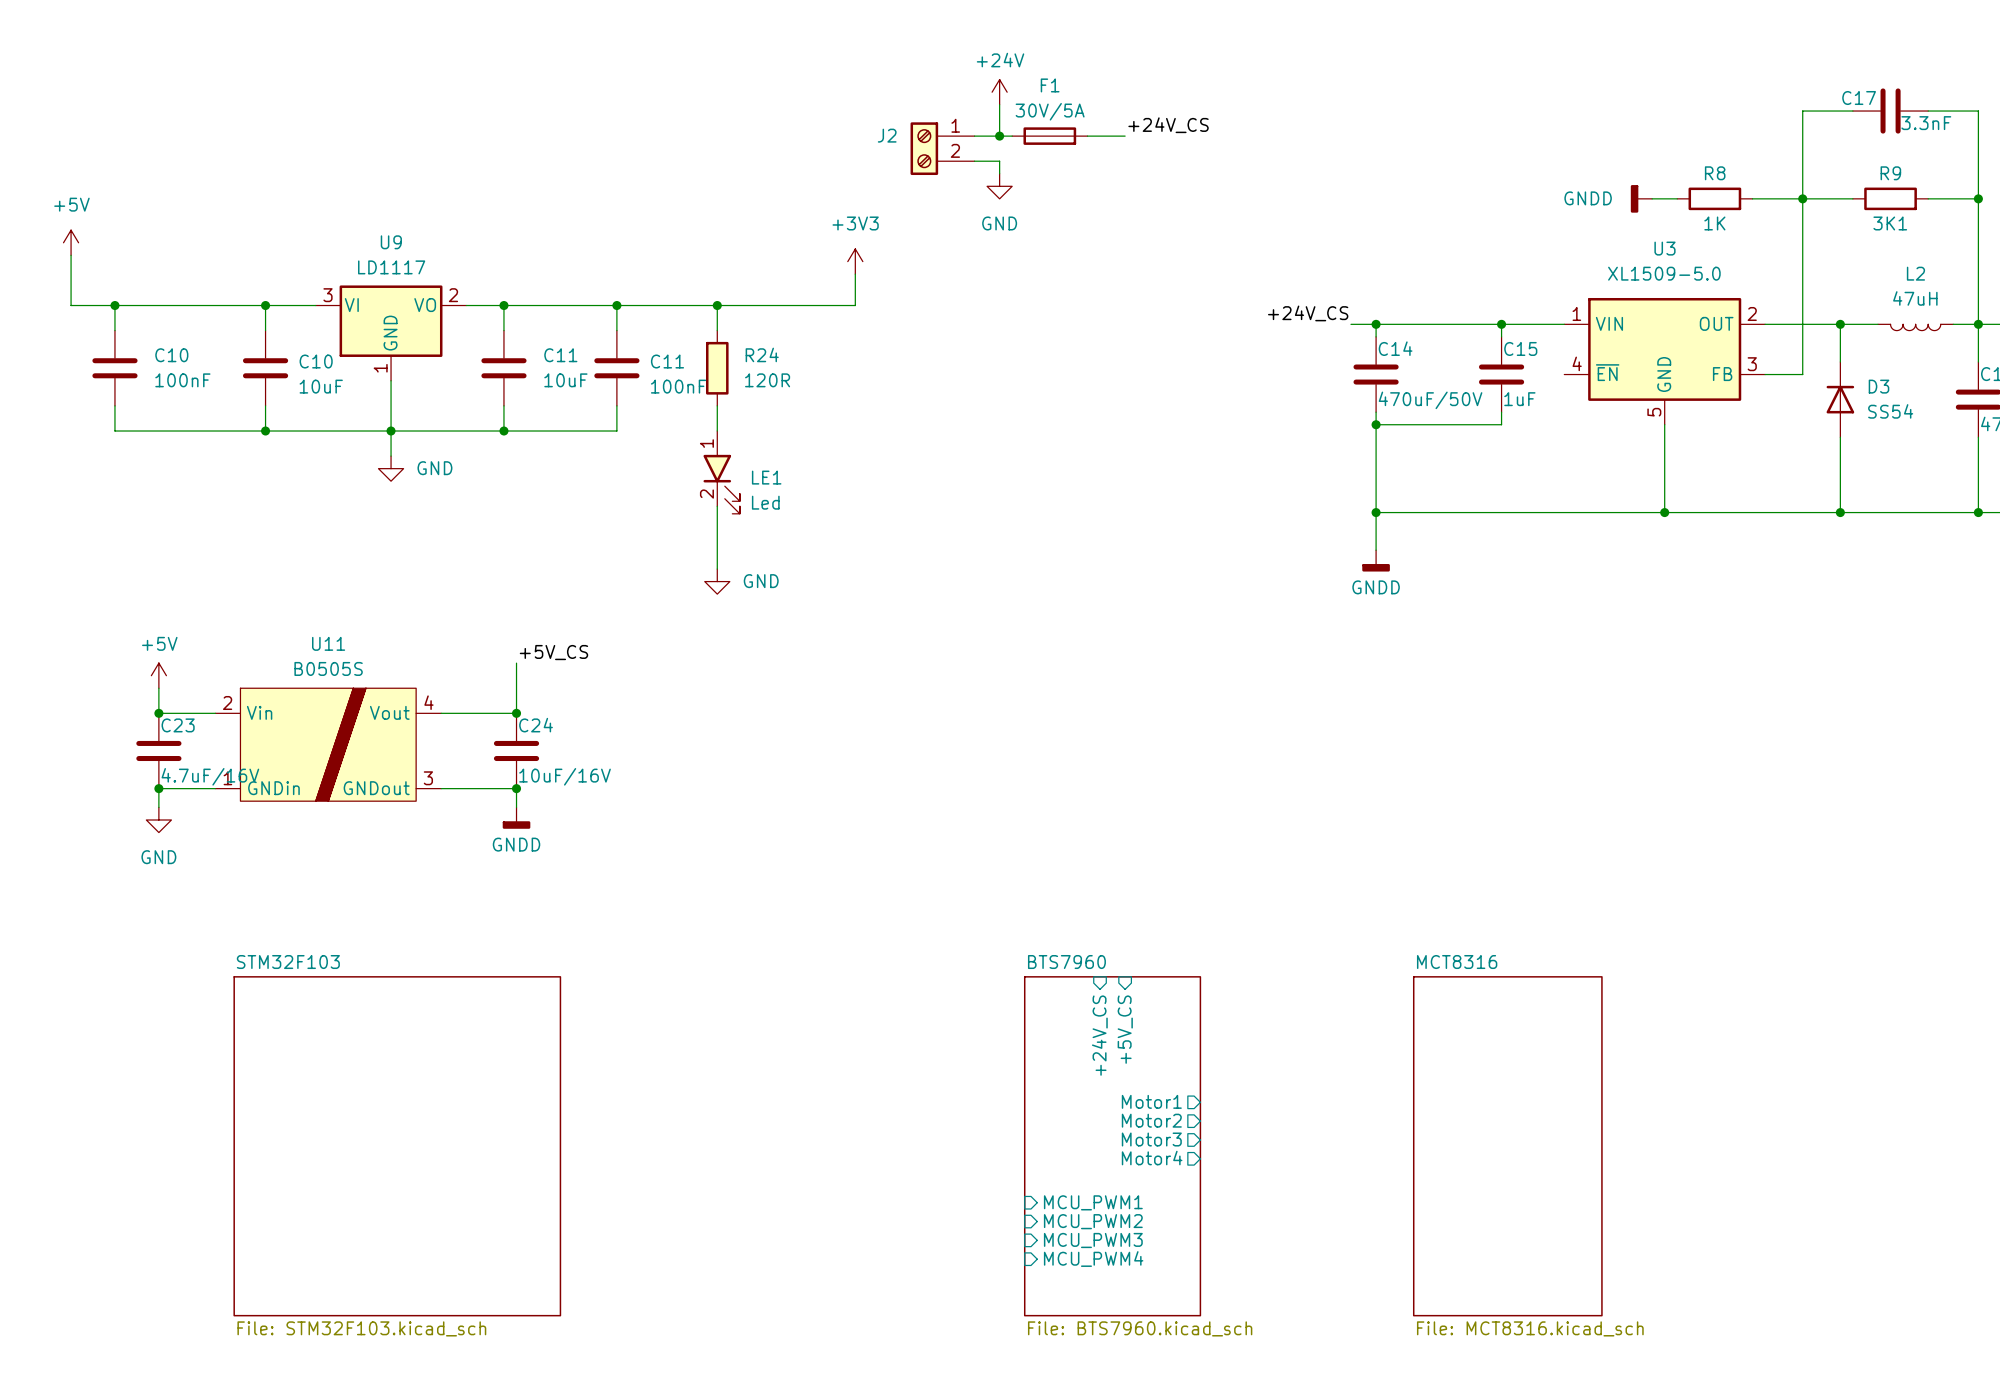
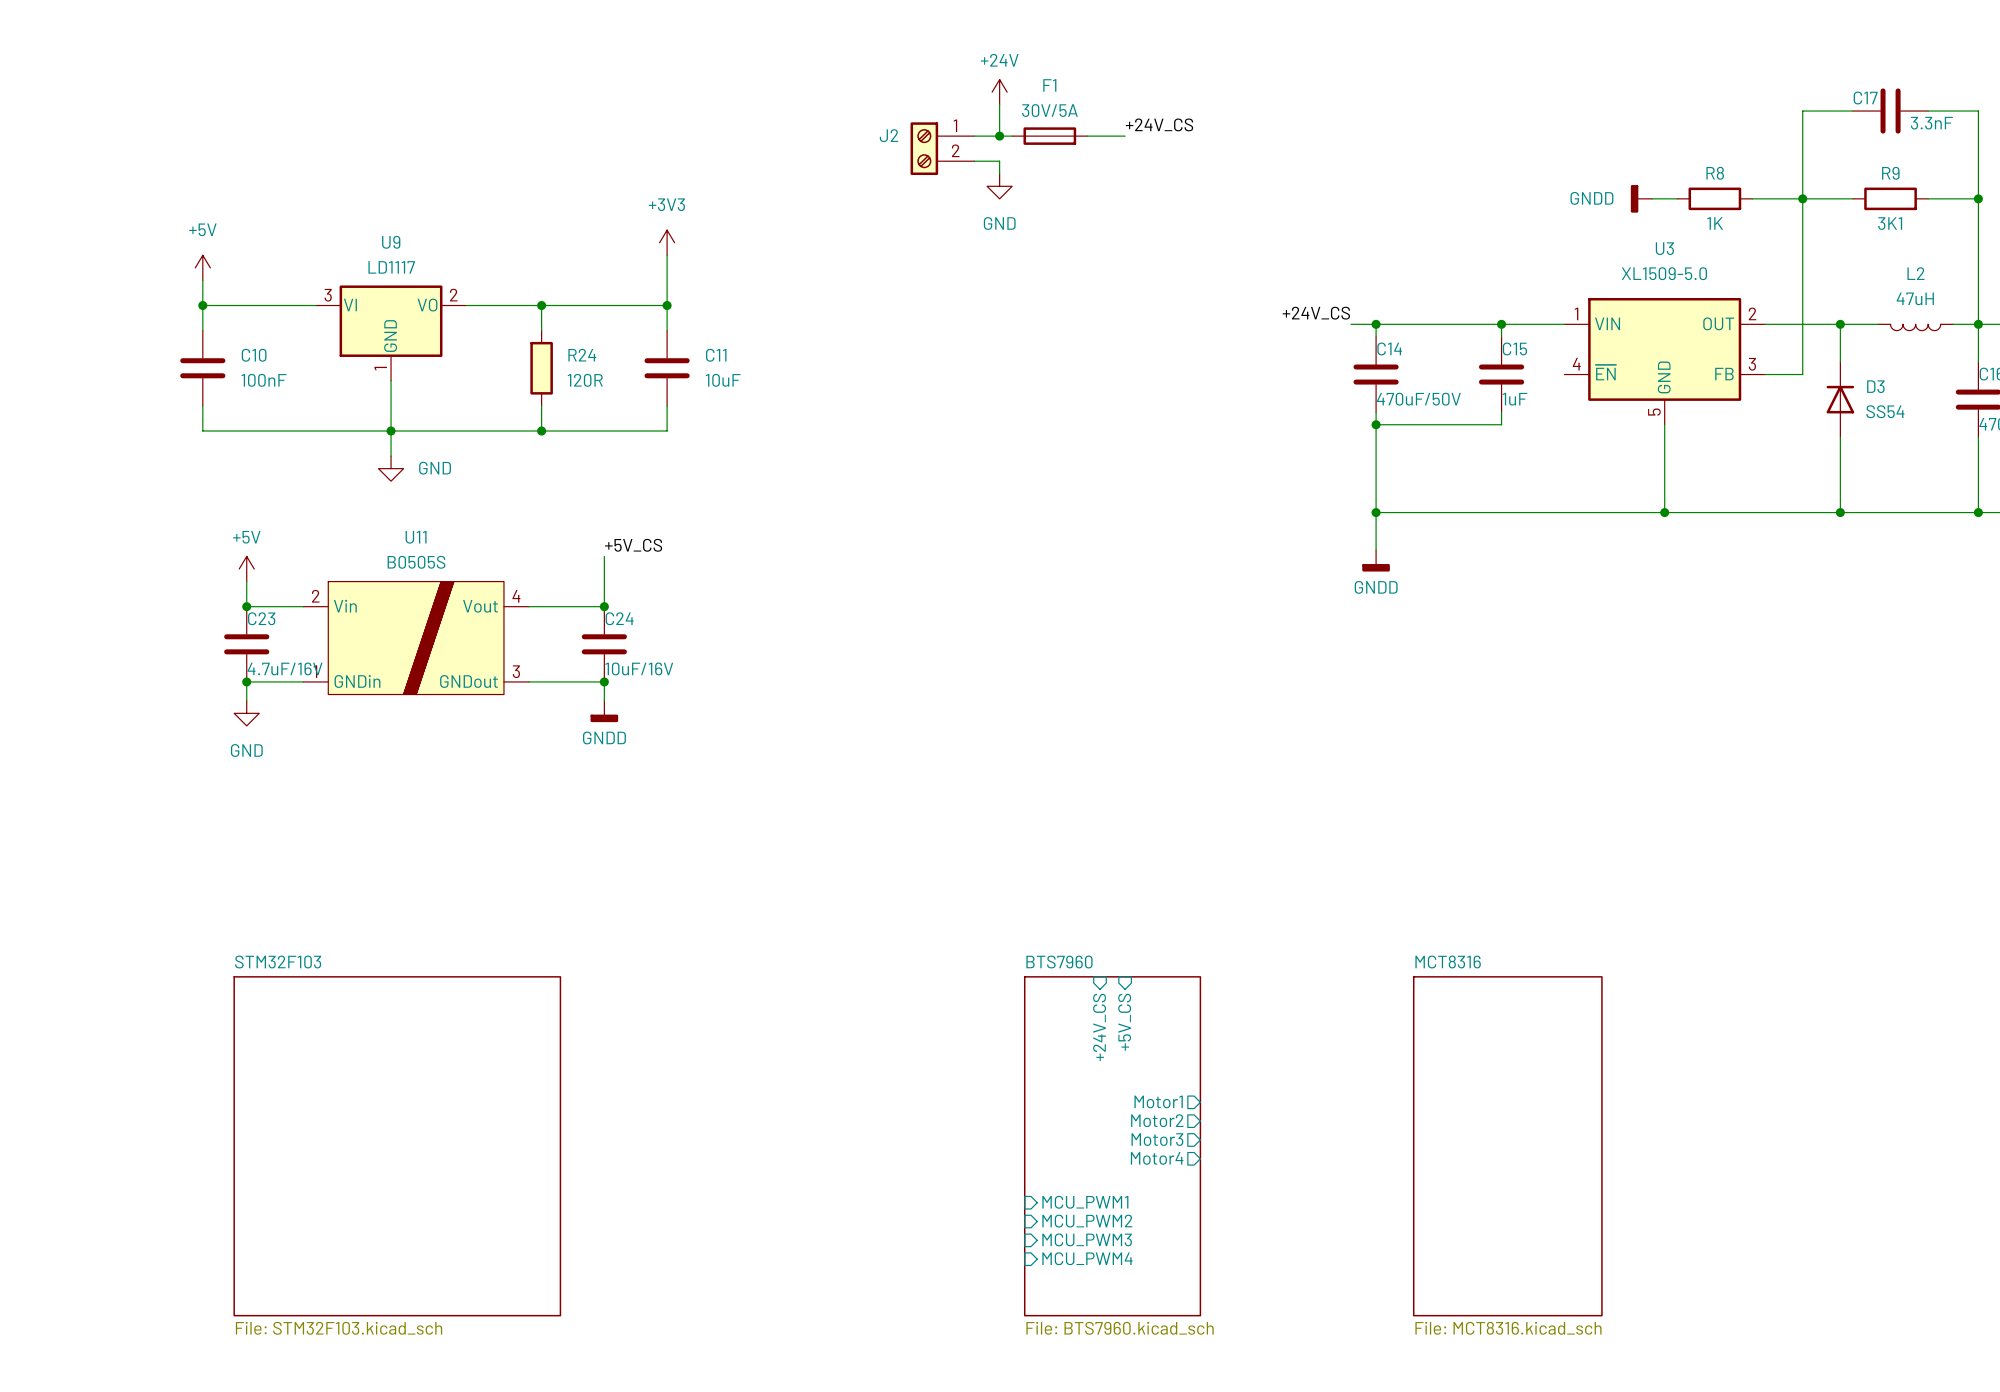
power symbol position: +5V (71, 242) -> +5V (202, 267)
wire: (71, 255) (71, 305) (202, 305) -> none
wire: none -> (667, 255) (667, 330)
power symbol position: +3V3 (855, 261) -> +3V3 (667, 242)
wire: (855, 274) (855, 305) (667, 305) -> none
wire: none -> (202, 280) (202, 330)
wire: (114, 305) (114, 330) -> none
junction: (114, 305) -> none
junction: none -> (202, 305)
wire: (265, 305) (265, 330) -> none
junction: (265, 305) -> none
wire: (503, 305) (503, 330) -> (541, 305) (541, 330)
junction: (503, 305) -> none
junction: none -> (541, 305)
wire: (616, 305) (616, 330) -> none
junction: (616, 305) -> none
junction: none -> (667, 305)
wire: (717, 305) (717, 330) -> none
junction: (717, 305) -> none
C10 position: (114, 368) -> (202, 368)
C10: 10uF (265, 368) -> none
C11 position: (503, 368) -> (667, 368)
C11: 100nF (616, 368) -> none
R24 position: (717, 368) -> (541, 368)
wire: (114, 405) (114, 431) (202, 431) -> (202, 405) (202, 431)
wire: (265, 405) (265, 431) -> none
wire: (503, 405) (503, 431) -> (541, 405) (541, 431)
wire: (616, 405) (616, 431) -> (667, 405) (667, 431) (616, 431)
wire: (717, 405) (717, 431) -> none
junction: (265, 431) -> none
junction position: (503, 431) -> (541, 431)
LE1: Led (721, 472) -> none
wire: (717, 506) (717, 569) -> none
power symbol: GND (717, 581) -> none
junction: none -> (246, 606)
junction: none -> (604, 606)
label position: +5V_CS (553, 652) -> +5V_CS (633, 545)
wire: (516, 663) (516, 713) (441, 713) -> (604, 556) (604, 606) (529, 606)
power symbol position: +5V (158, 675) -> +5V (246, 569)
junction: none -> (246, 681)
junction: none -> (604, 681)
wire: (158, 688) (158, 713) (215, 713) -> (246, 581) (246, 606) (303, 606)
junction: (158, 713) -> none
junction: (516, 713) -> none
U11 position: (328, 744) -> (416, 638)
C23 position: (158, 750) -> (246, 644)
C24 position: (516, 750) -> (604, 644)
junction: (158, 788) -> none
wire: (215, 788) (158, 788) (158, 807) -> (303, 681) (246, 681) (246, 700)
wire: (441, 788) (516, 788) (516, 807) -> (529, 681) (604, 681) (604, 700)
junction: (516, 788) -> none
power symbol position: GNDD (516, 818) -> GNDD (604, 711)
power symbol position: GND (158, 820) -> GND (246, 713)

